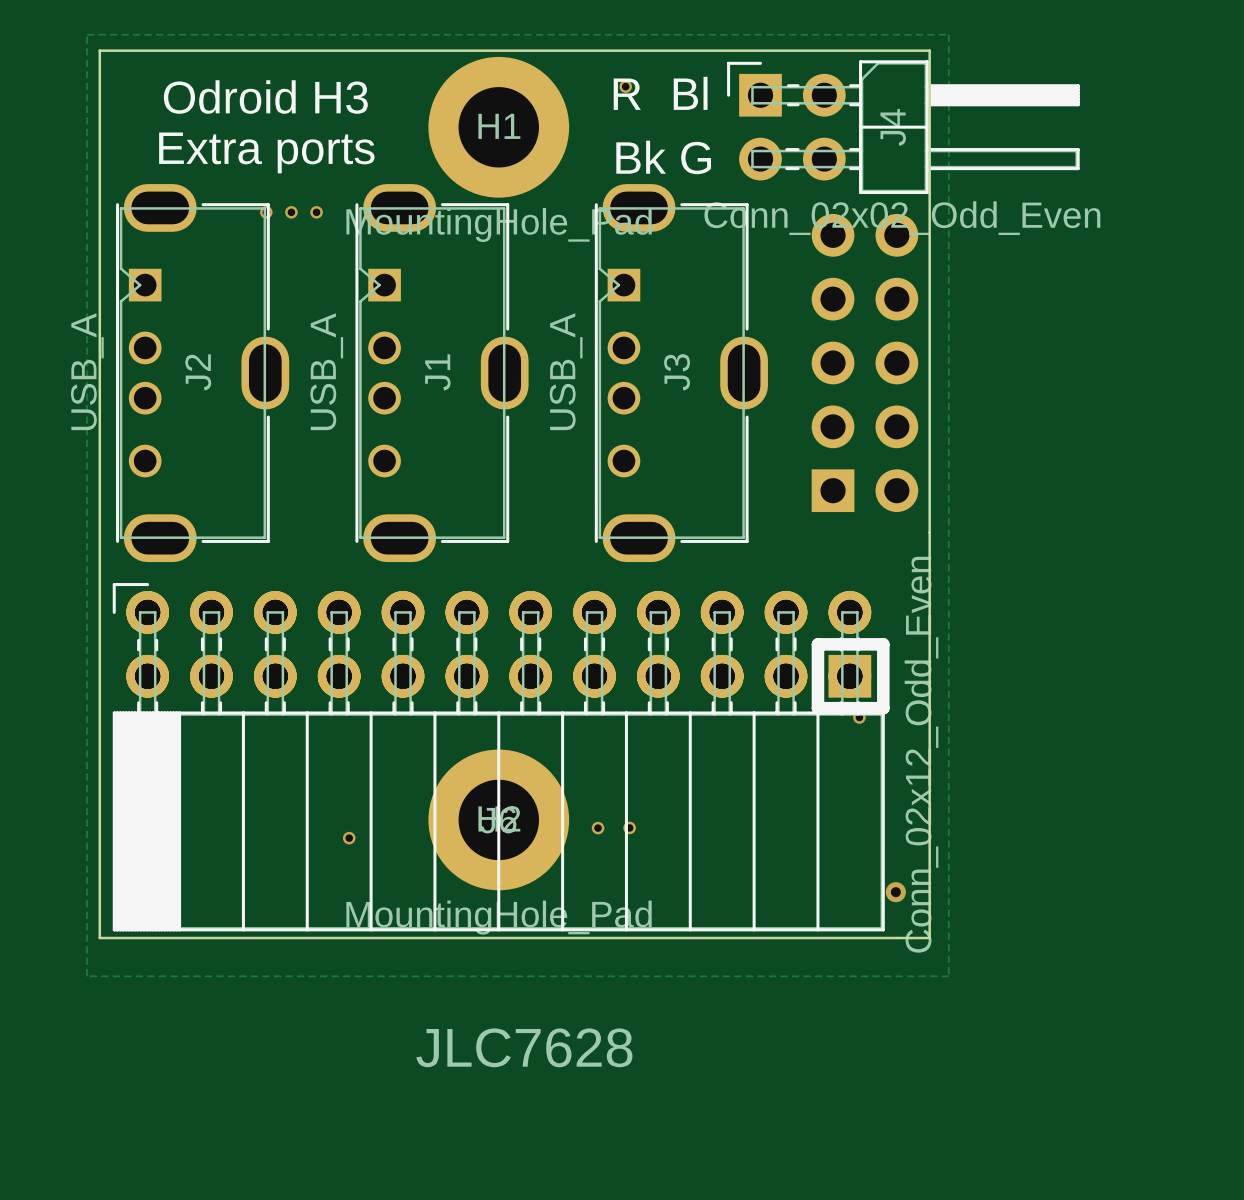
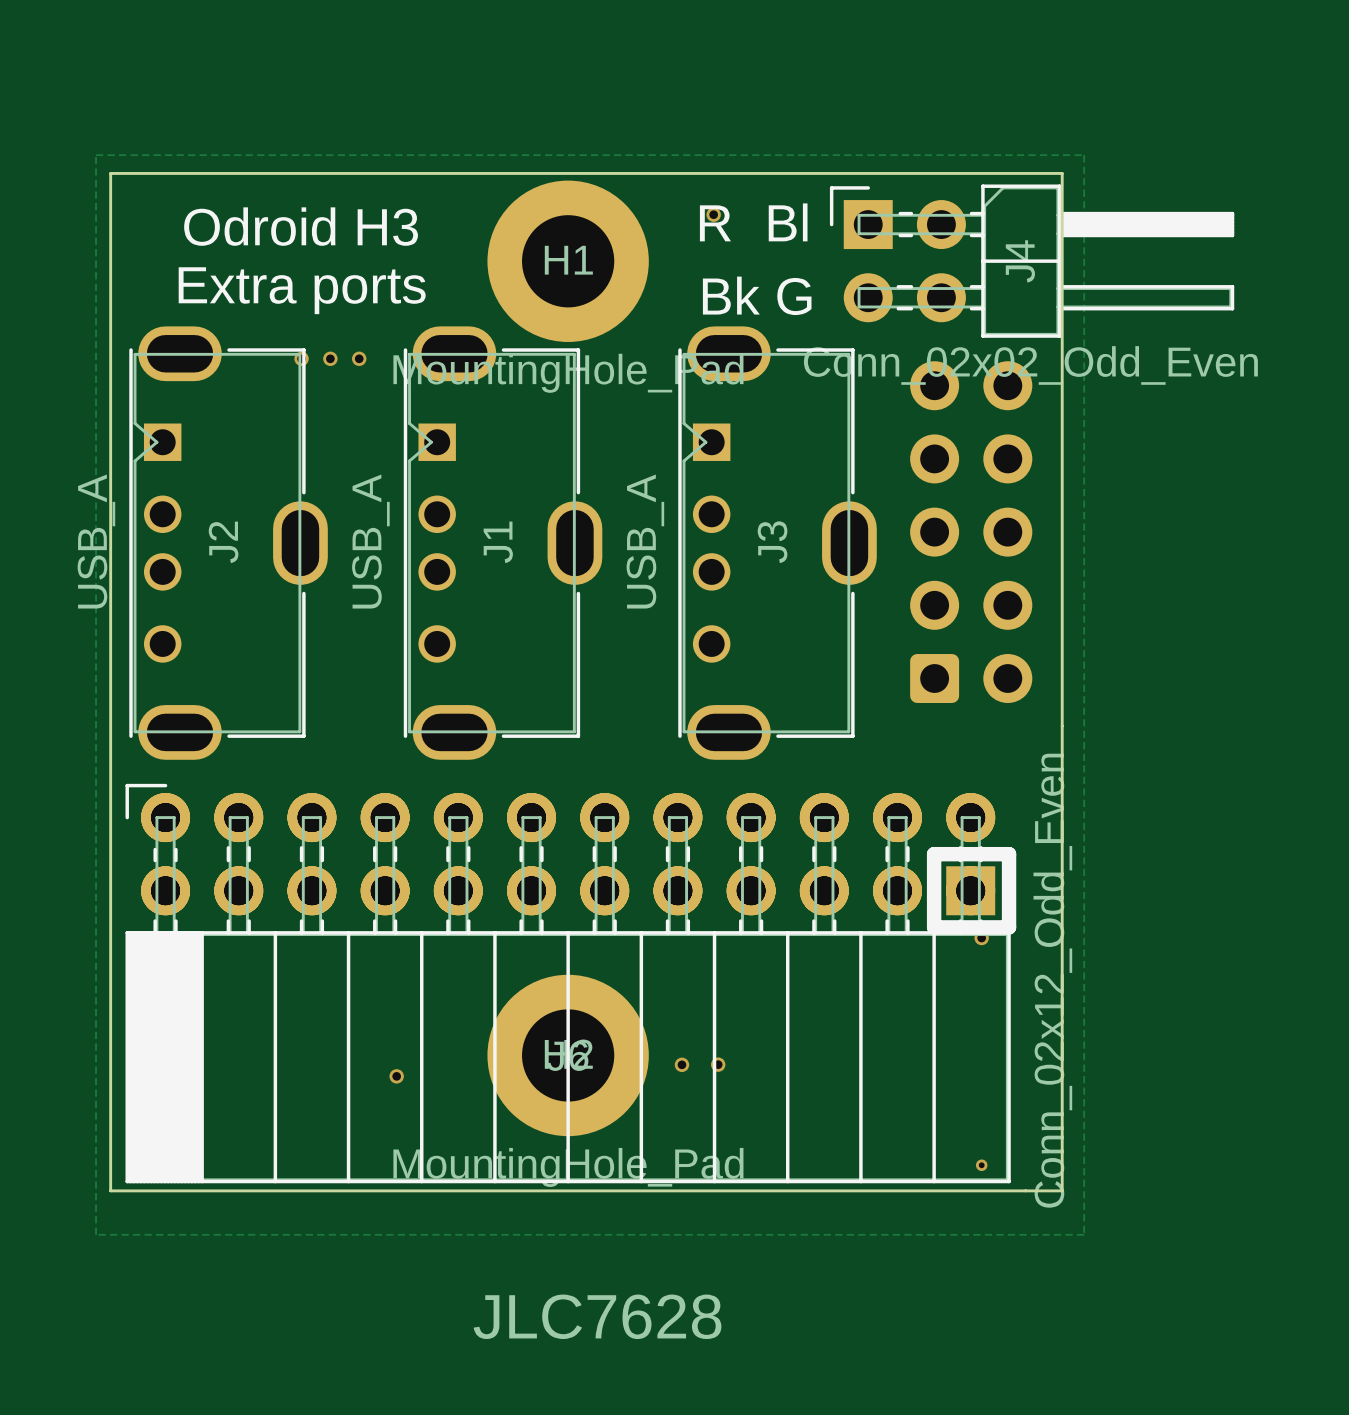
part footprint: [811, 213, 919, 513] -> [910, 361, 1033, 704]
via: (895, 892) -> none
via: none -> (981, 1165)

